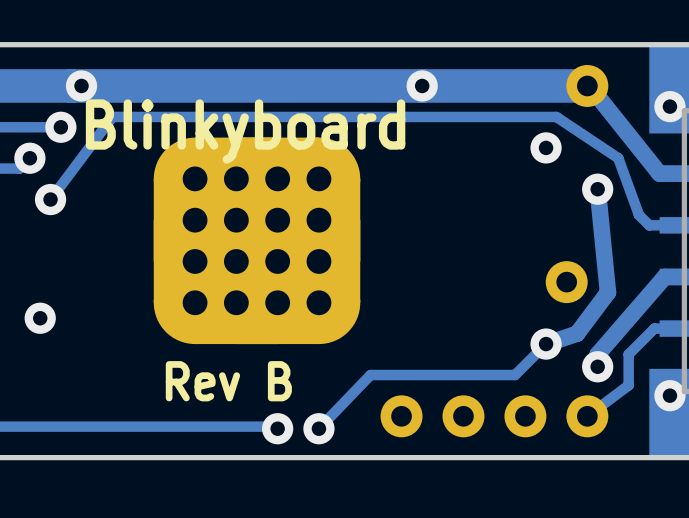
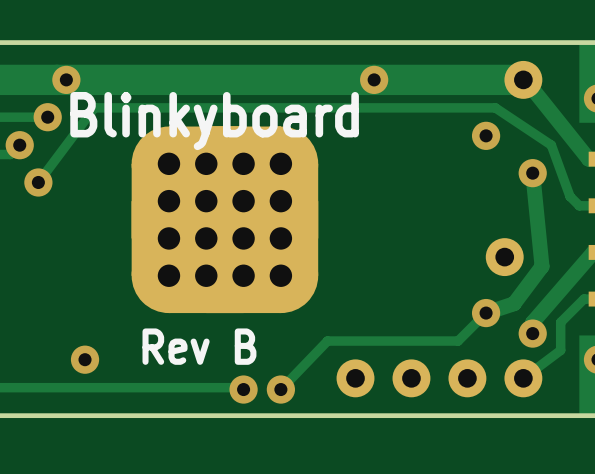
via position: (40, 318) -> (85, 359)

